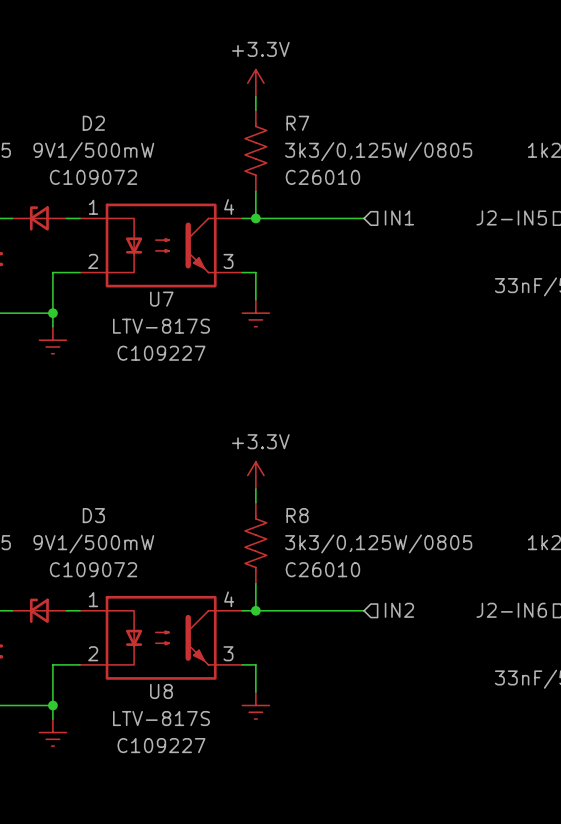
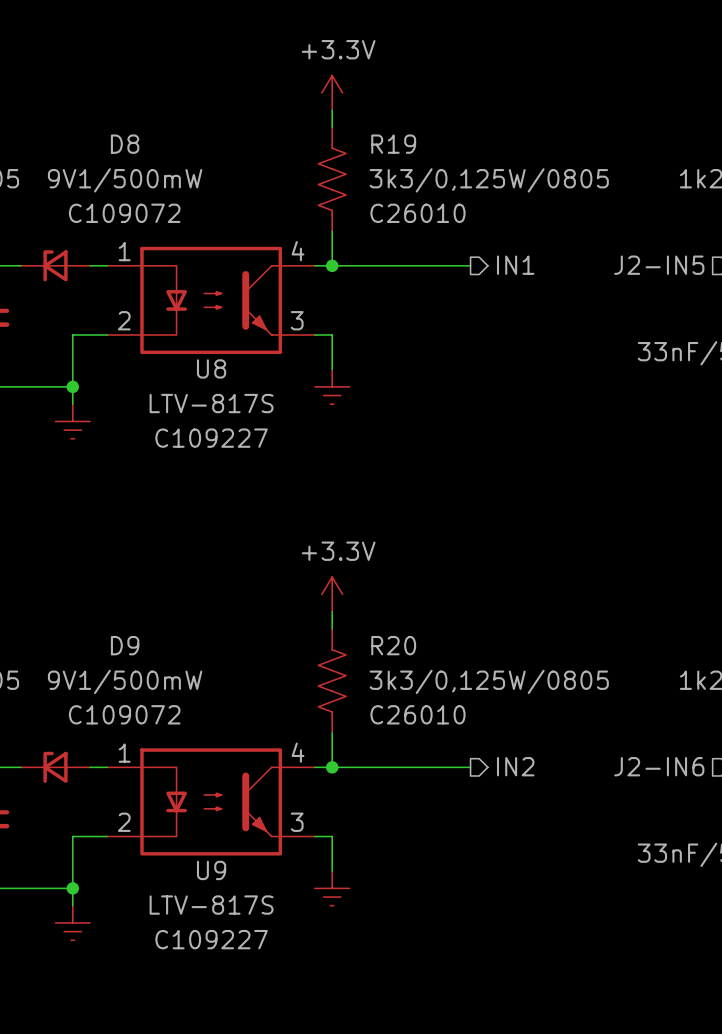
D2 name: D2 (93, 123) -> D8 (125, 144)
R7 name: R7 (297, 123) -> R19 (393, 144)
hierarchical label shape: input (399, 217) -> output (515, 265)
U7 name: U7 (161, 299) -> U8 (211, 368)
D3 name: D3 (93, 515) -> D9 (125, 645)
R8 name: R8 (297, 515) -> R20 (393, 645)
hierarchical label shape: input (399, 610) -> output (515, 766)
U8 name: U8 (161, 691) -> U9 (211, 870)

